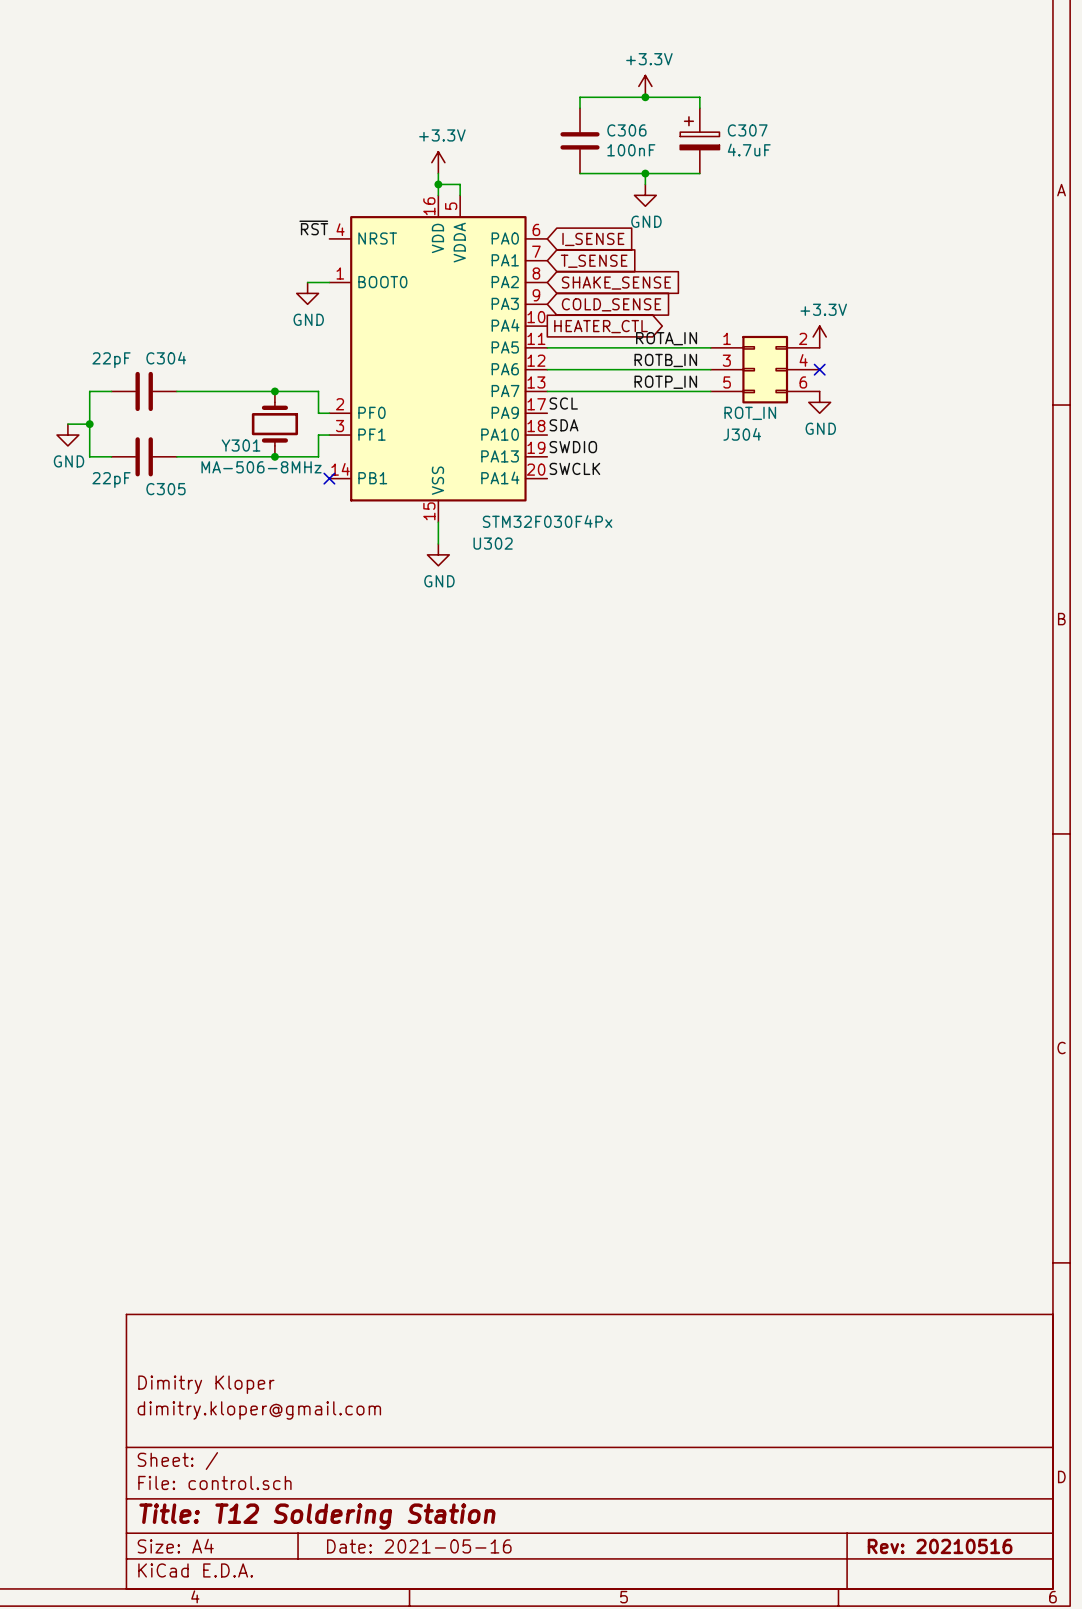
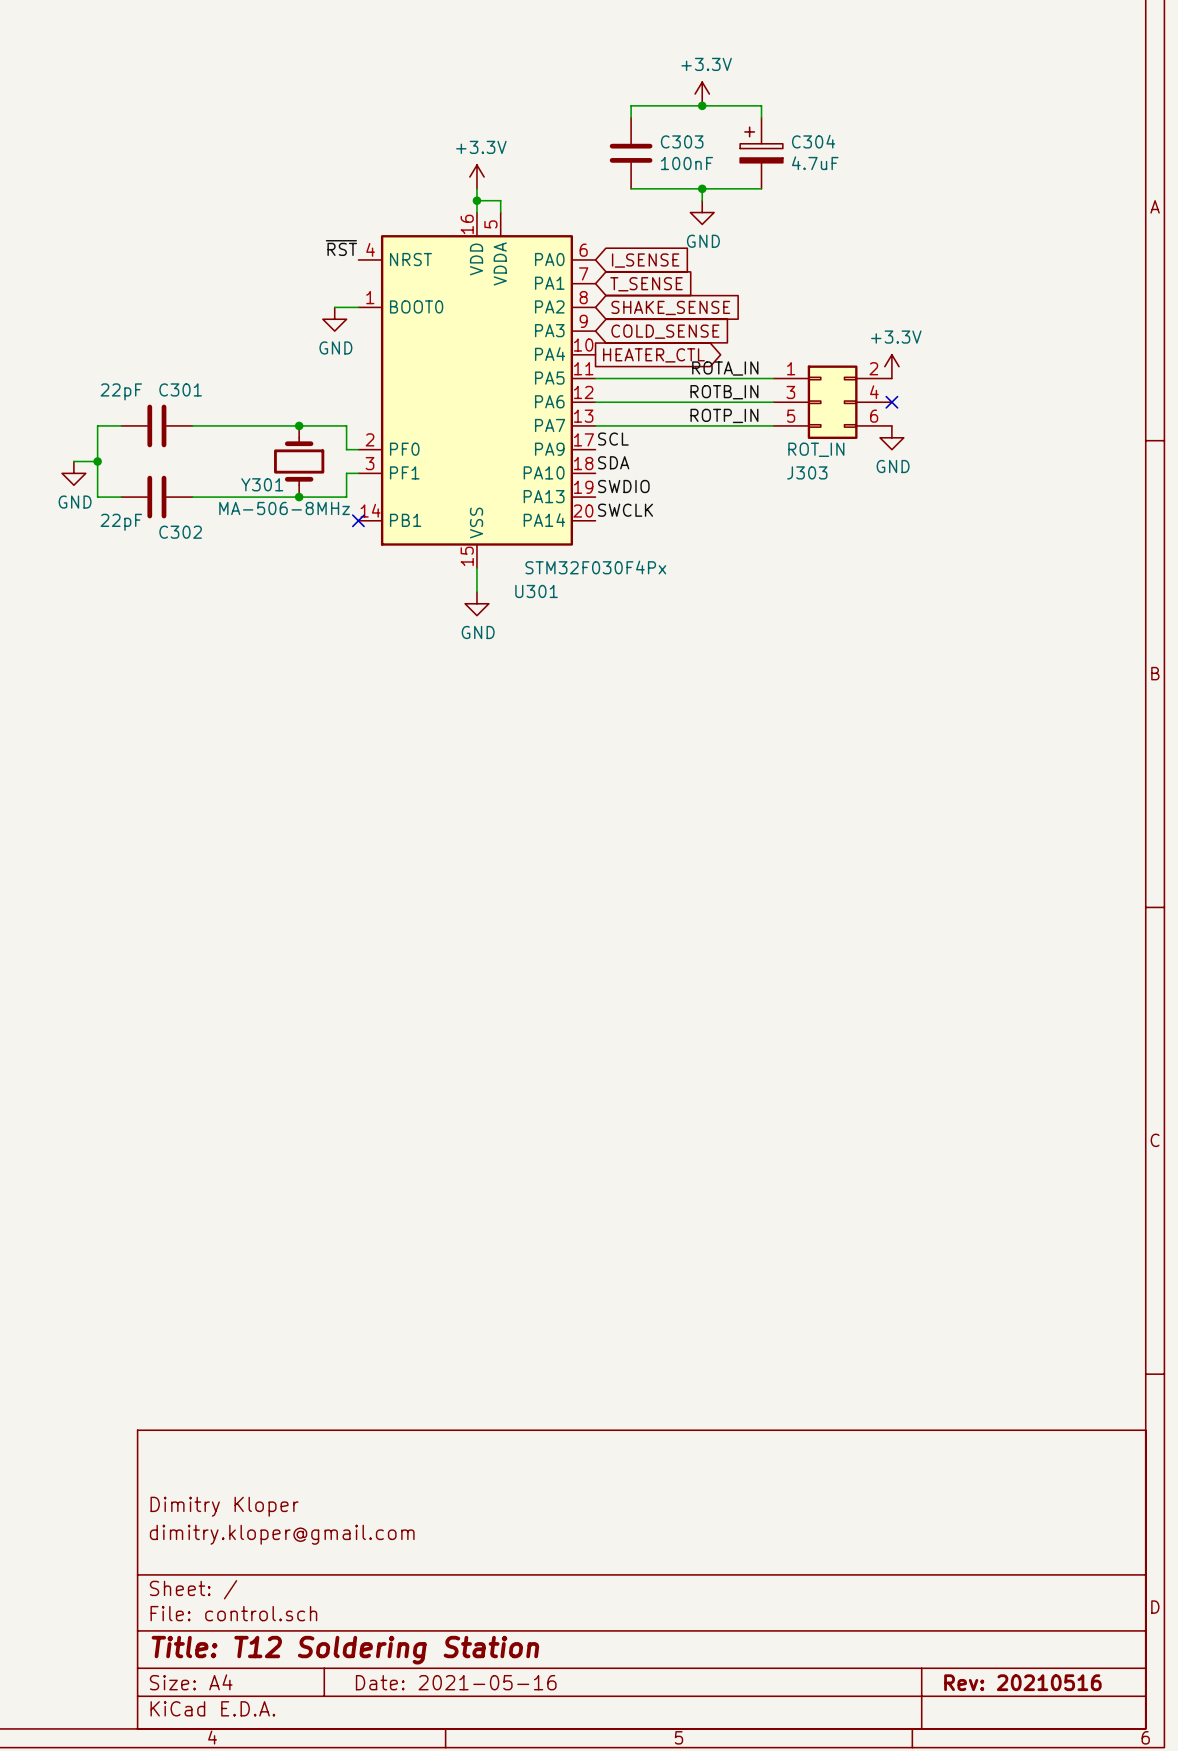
C306 name: C306 (626, 130) -> C303 (682, 141)
C307 name: C307 (747, 130) -> C304 (813, 141)
C304 name: C304 (166, 358) -> C301 (180, 389)
J304 name: J304 (742, 434) -> J303 (807, 472)
C305 name: C305 (165, 489) -> C302 (180, 532)
U302 name: U302 (493, 543) -> U301 (536, 591)

